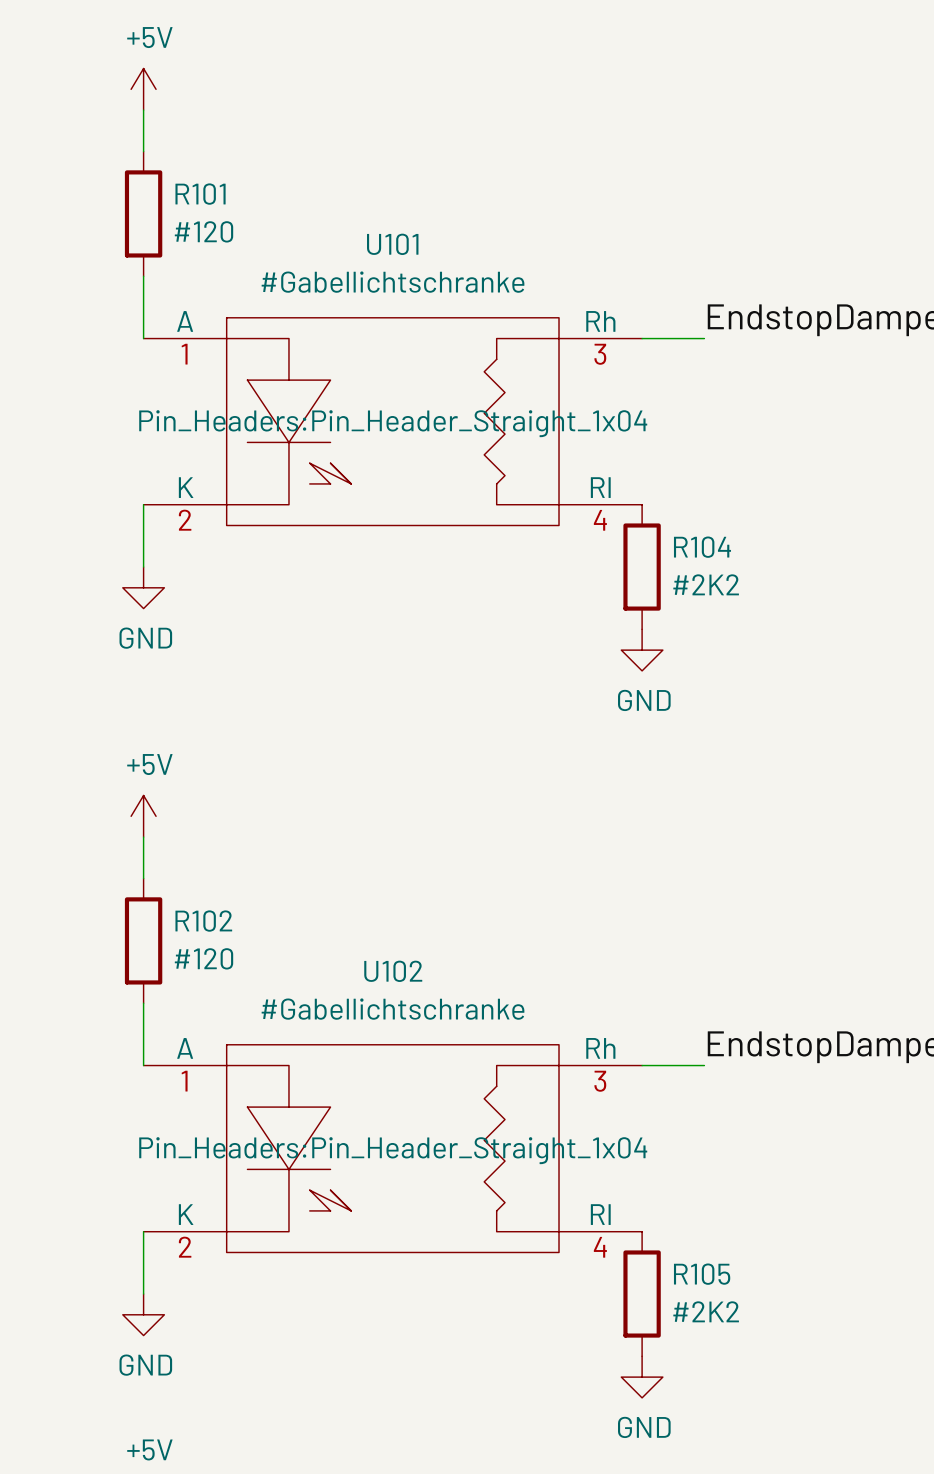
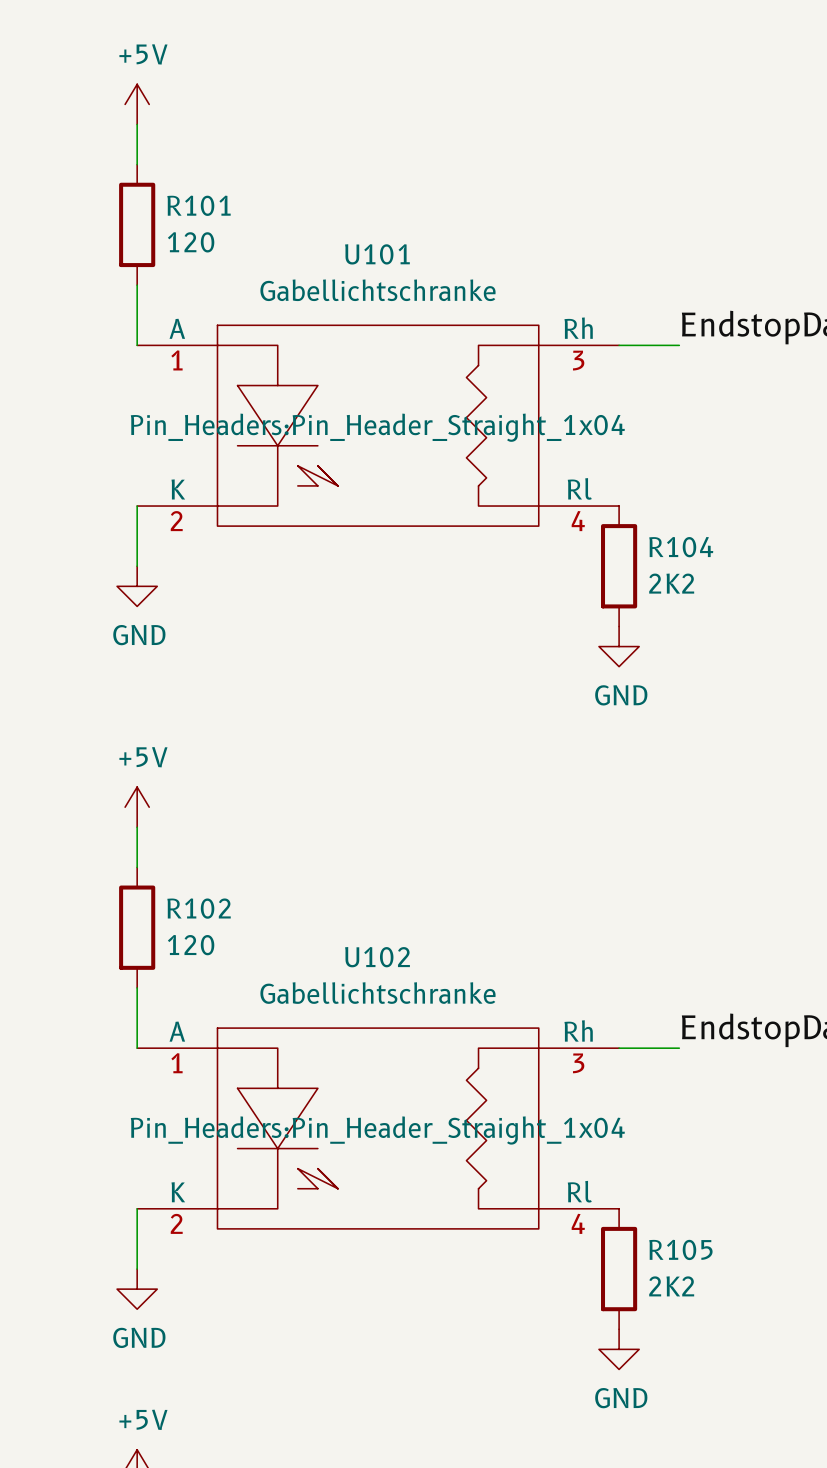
R101 value: #120 (203, 231) -> 120 (191, 242)
U101 value: #Gabellichtschranke (393, 282) -> Gabellichtschranke (377, 290)
R104 value: #2K2 (706, 584) -> 2K2 (671, 583)
R102 value: #120 (203, 958) -> 120 (191, 945)
U102 value: #Gabellichtschranke (393, 1009) -> Gabellichtschranke (377, 993)
R105 value: #2K2 (706, 1311) -> 2K2 (671, 1286)

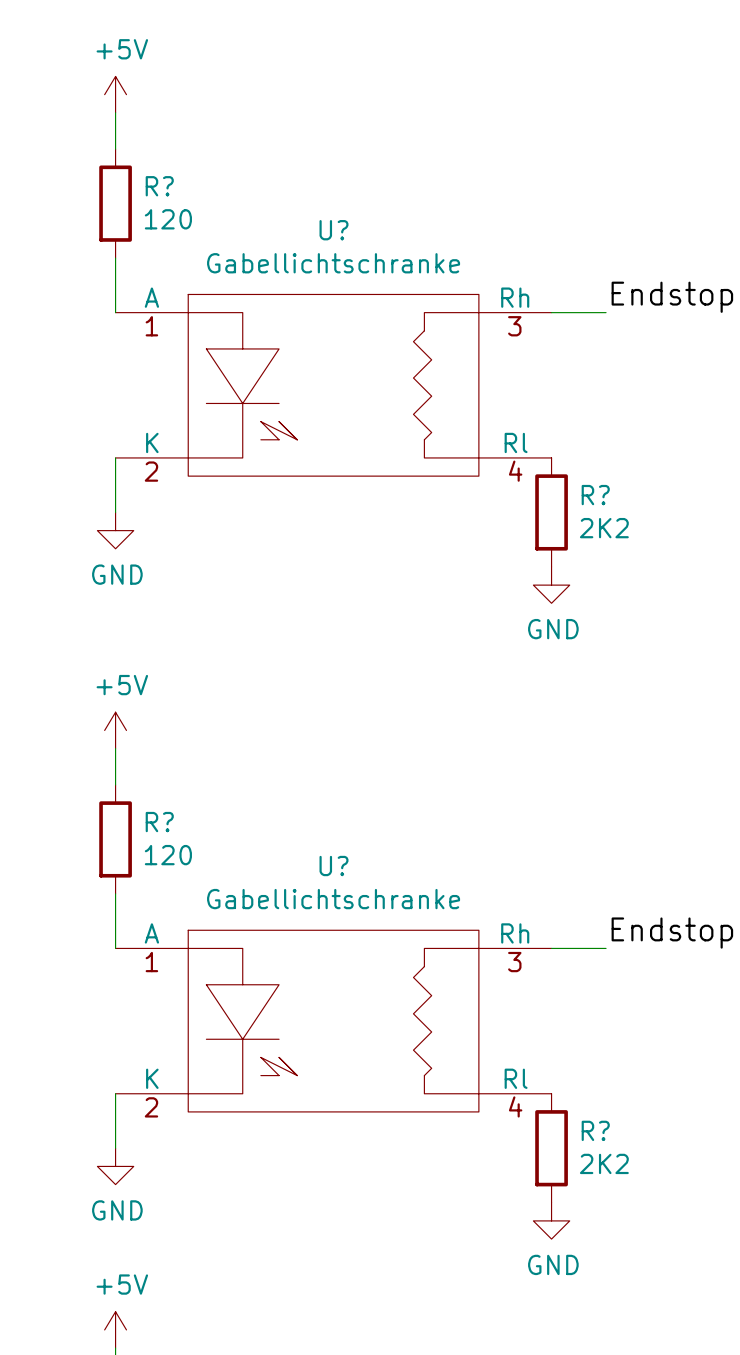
R101 name: R101 (199, 205) -> R? (159, 186)
U101 name: U101 (377, 254) -> U? (333, 230)
U101 text: Pin_Headers:Pin_Header_Straight_1x04 (377, 427) -> none
R104 name: R104 (681, 547) -> R? (595, 495)
R102 name: R102 (199, 908) -> R? (159, 822)
U102 name: U102 (377, 957) -> U? (333, 866)
U102 text: Pin_Headers:Pin_Header_Straight_1x04 (377, 1130) -> none
R105 name: R105 (680, 1249) -> R? (595, 1130)

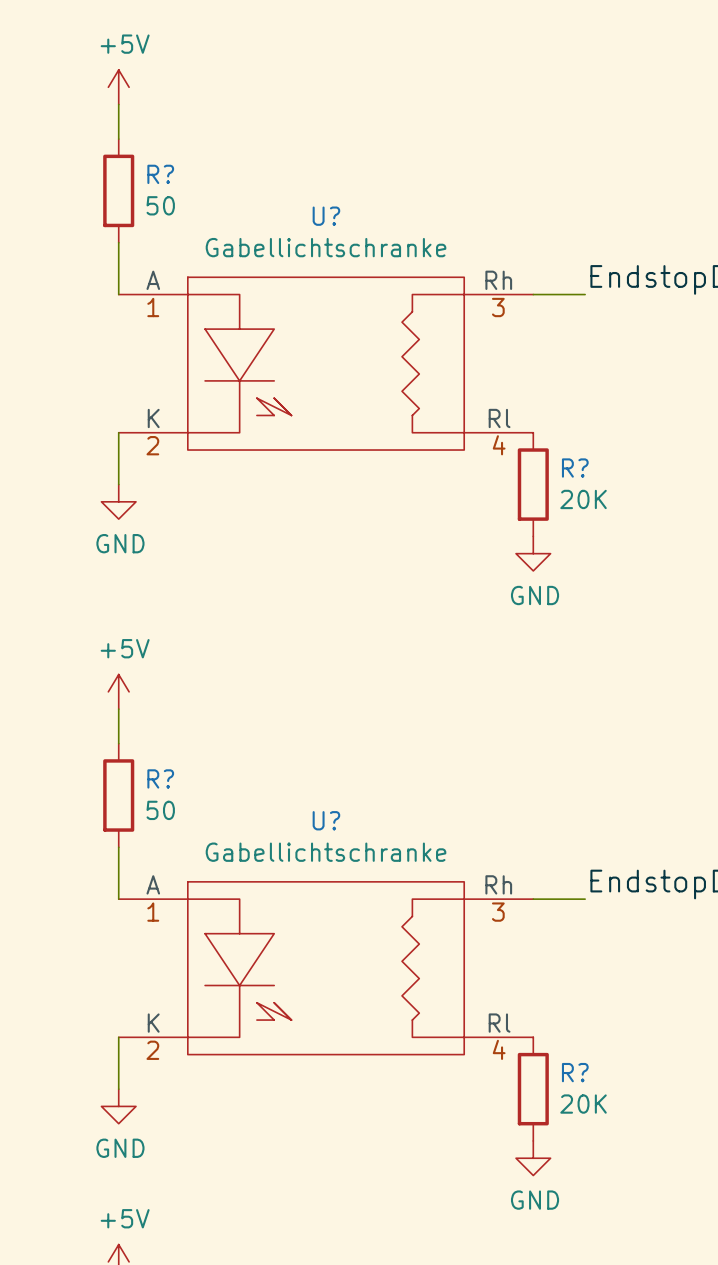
R? value: 120 (168, 219) -> 50 (160, 205)
R? value: 2K2 (604, 528) -> 20K (583, 499)
R? value: 120 (168, 855) -> 50 (160, 810)
R? value: 2K2 (604, 1163) -> 20K (583, 1104)

